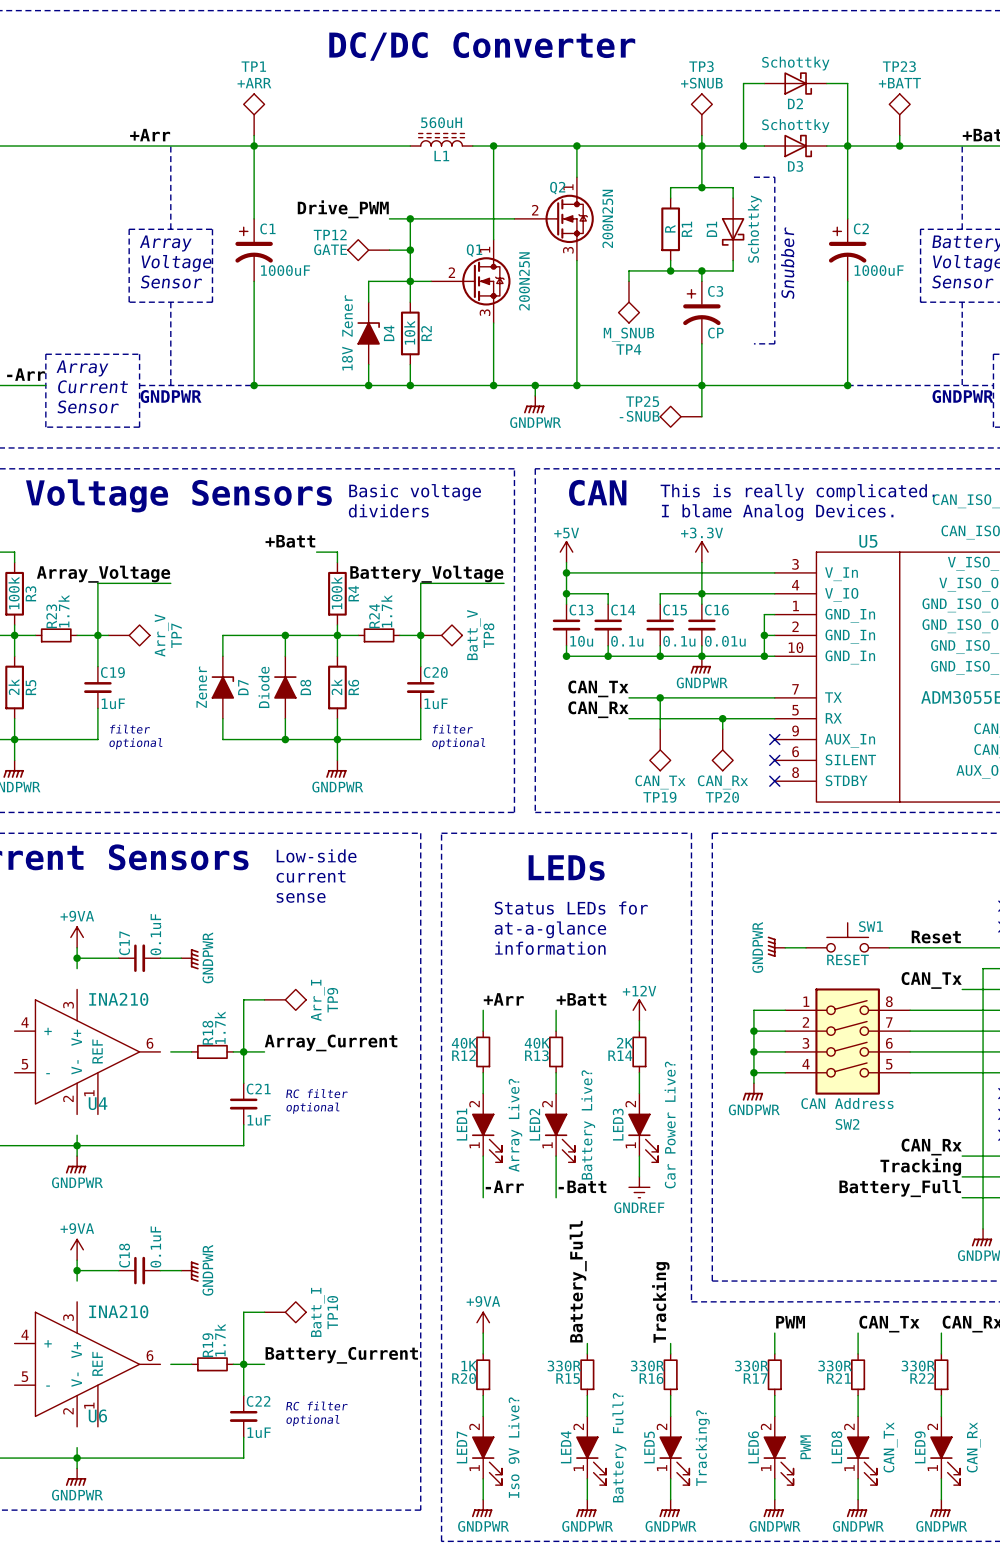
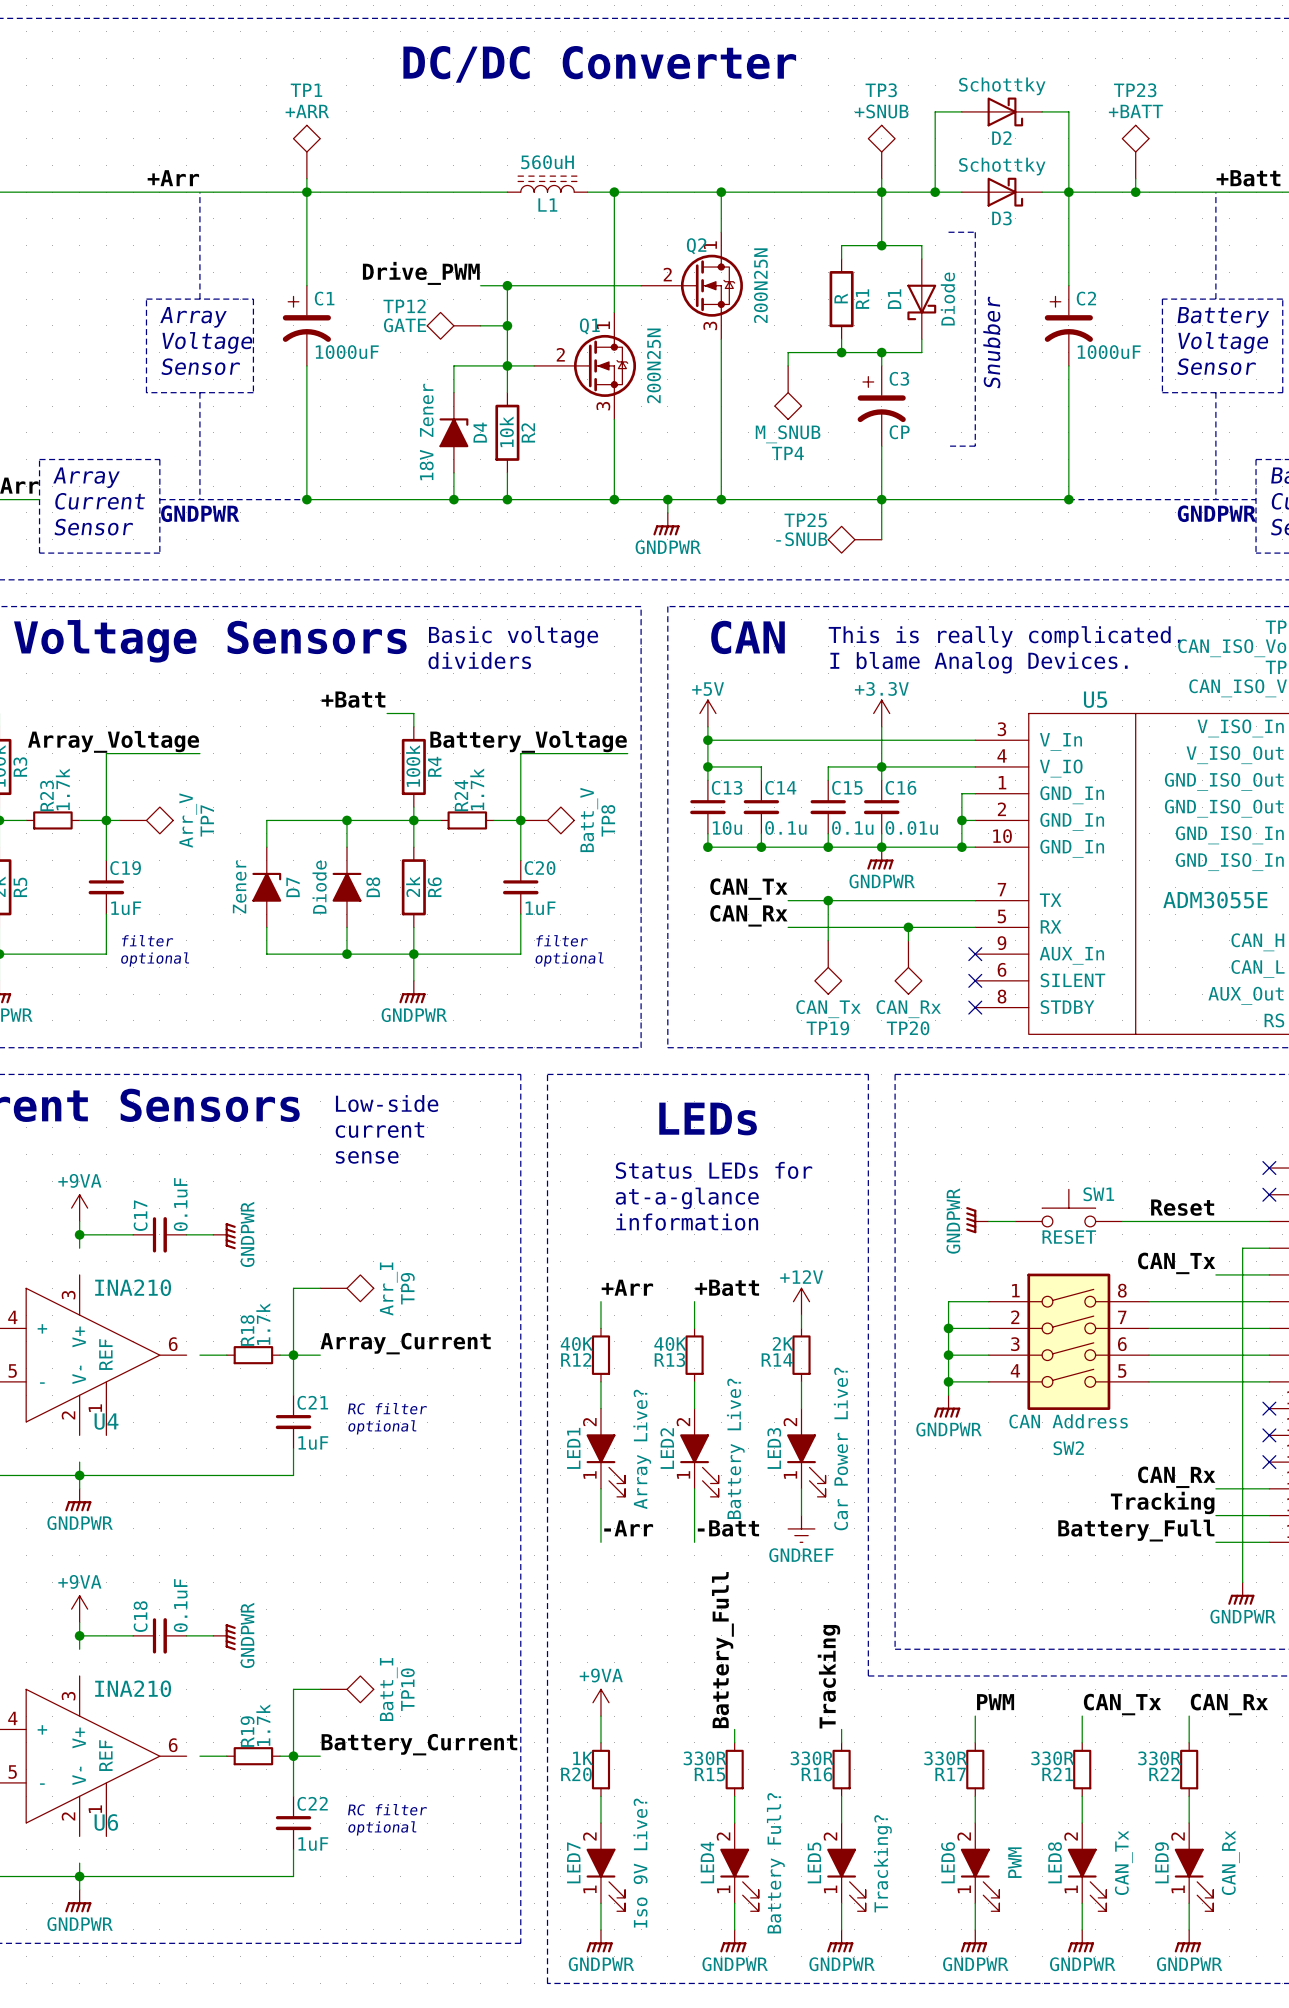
D1 value: Schottky (754, 229) -> Diode (947, 299)

